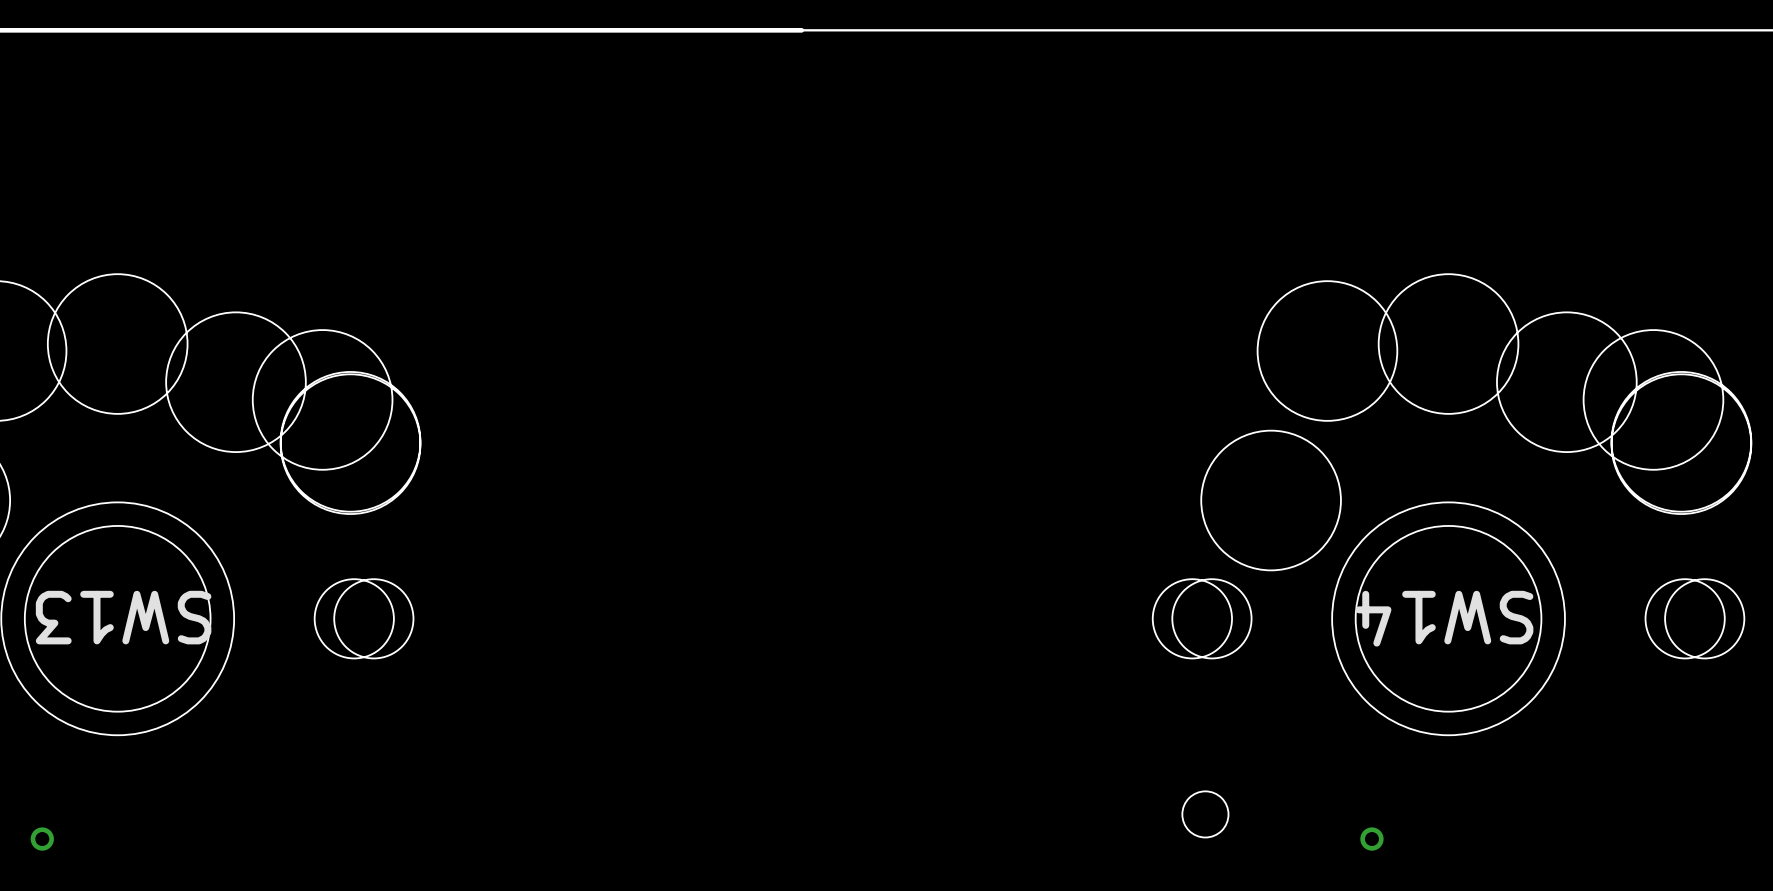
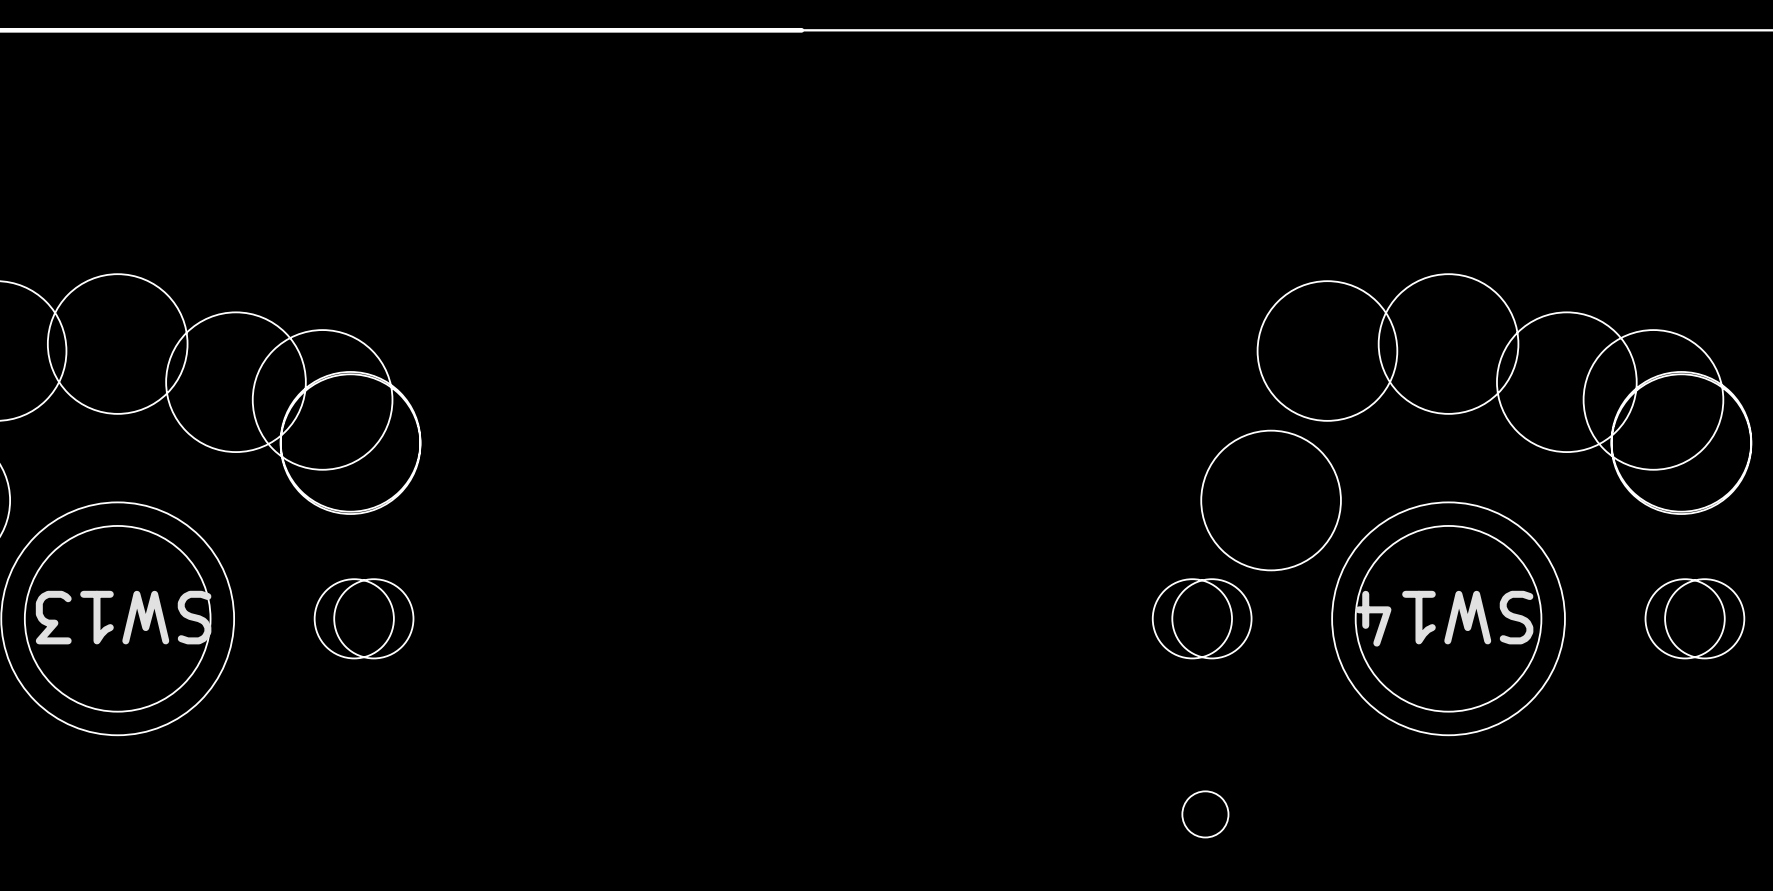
via: (42, 839) -> none
via: (1371, 839) -> none

